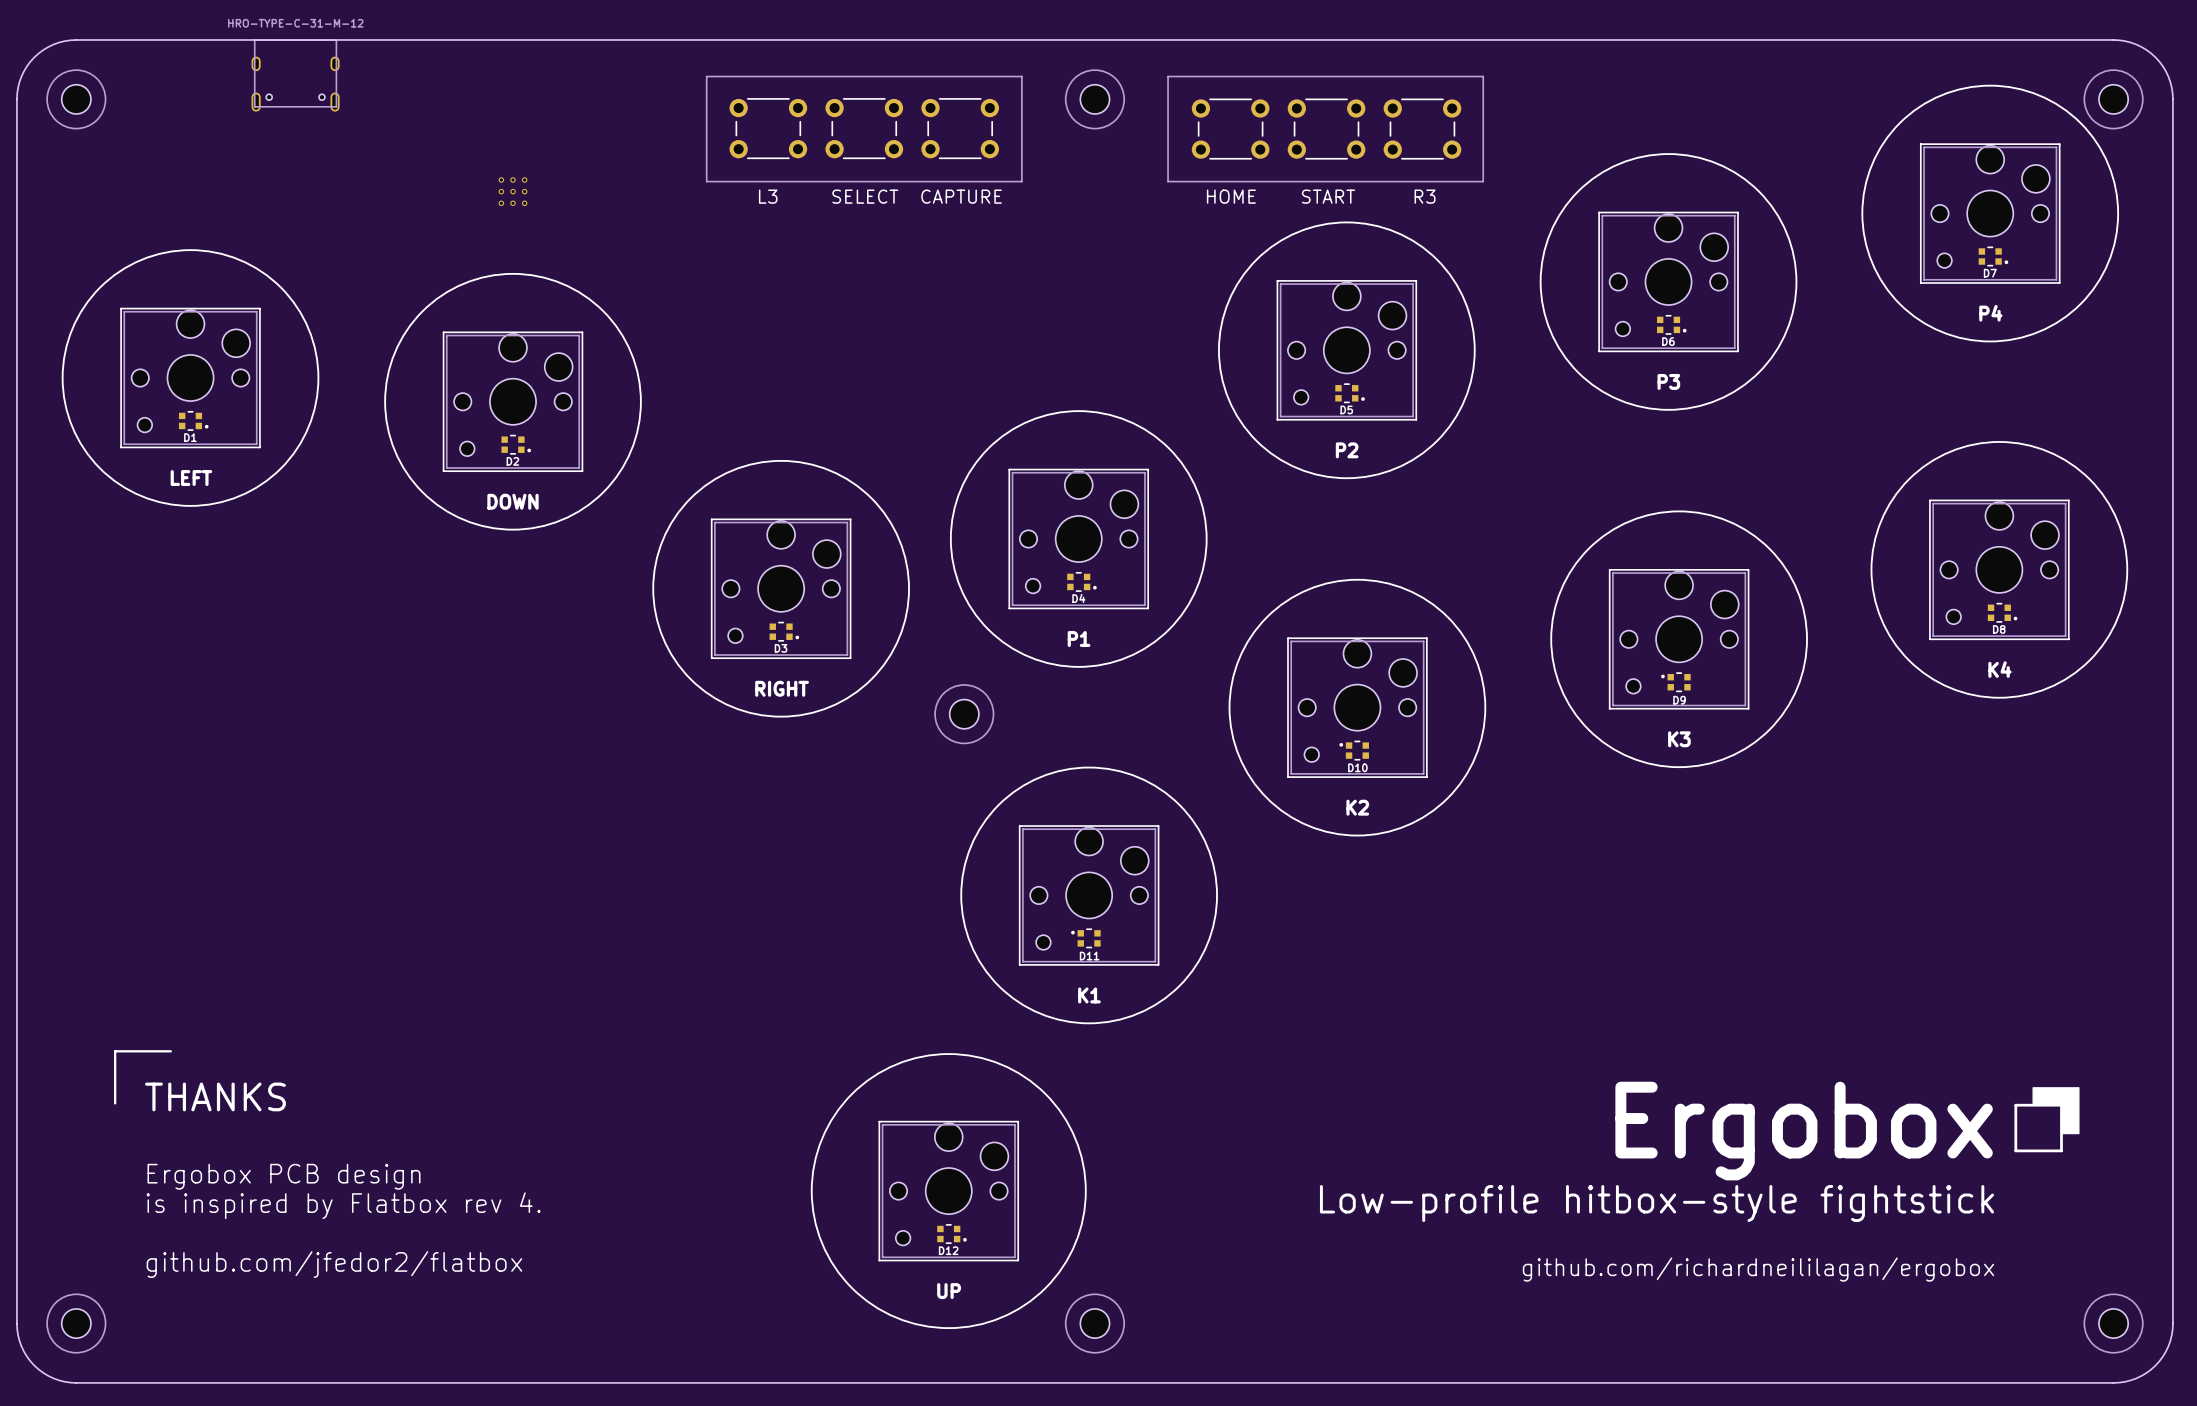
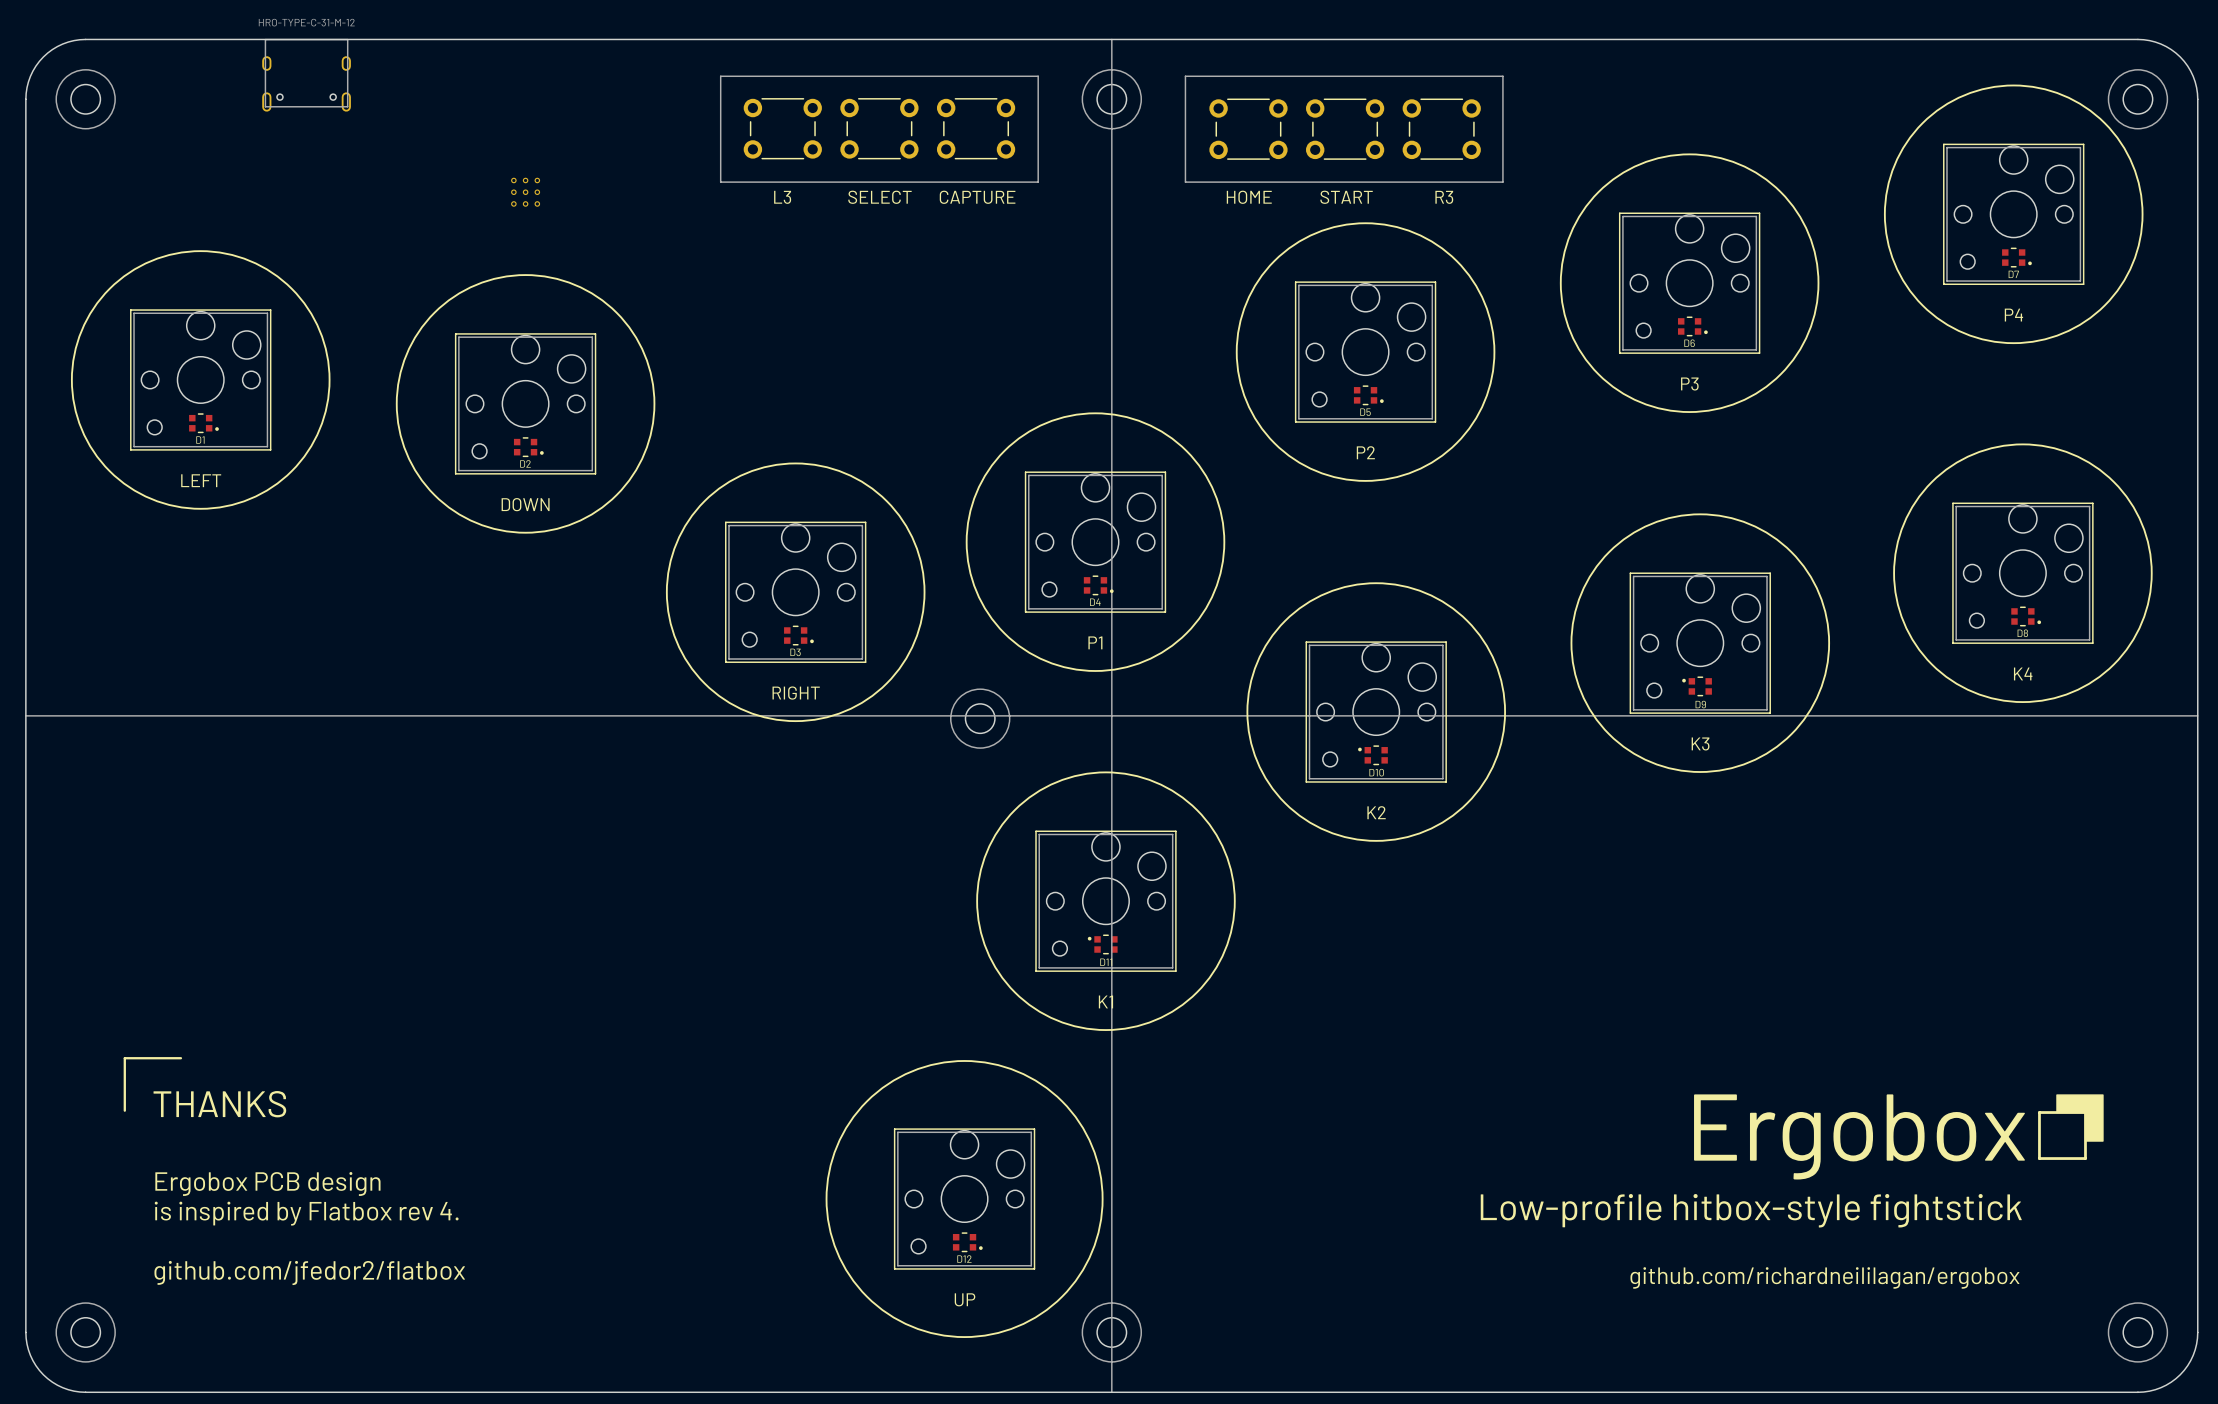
line: none -> (1111, 39) (1111, 1392)
line: none -> (25, 715) (2197, 715)

